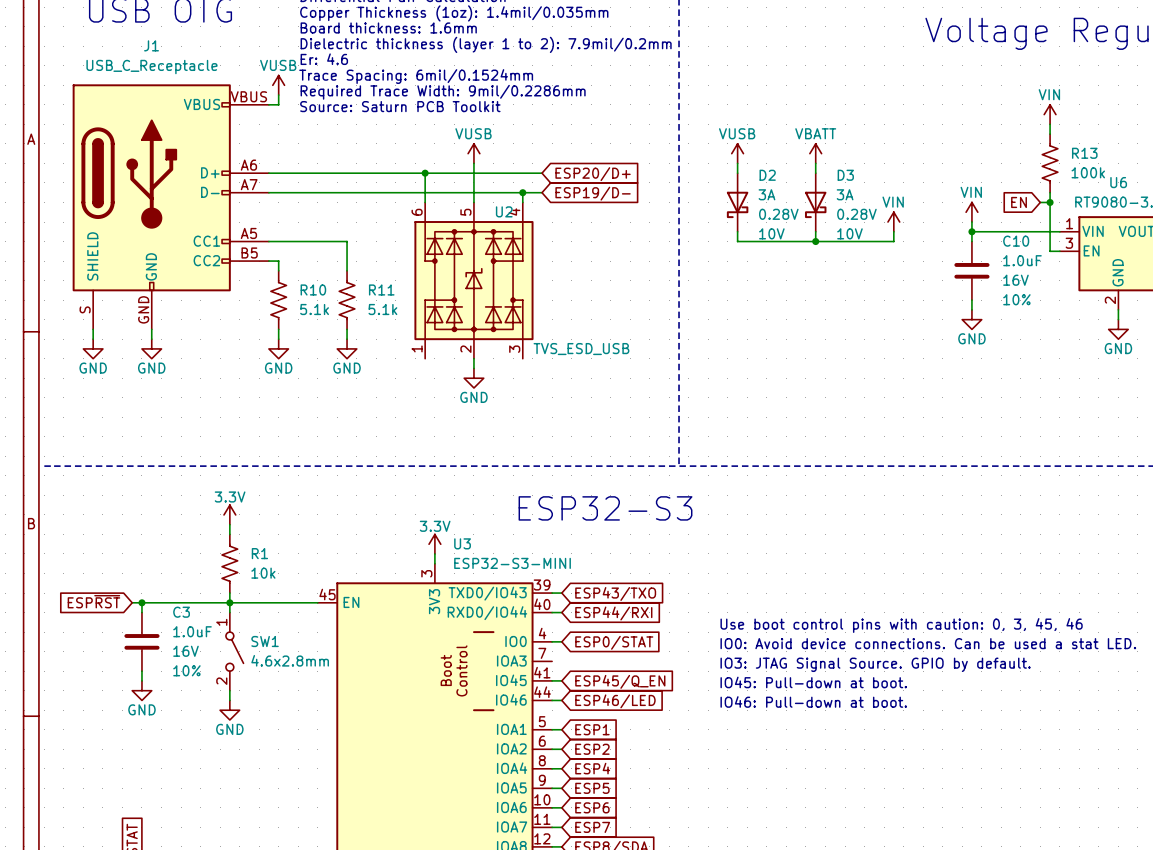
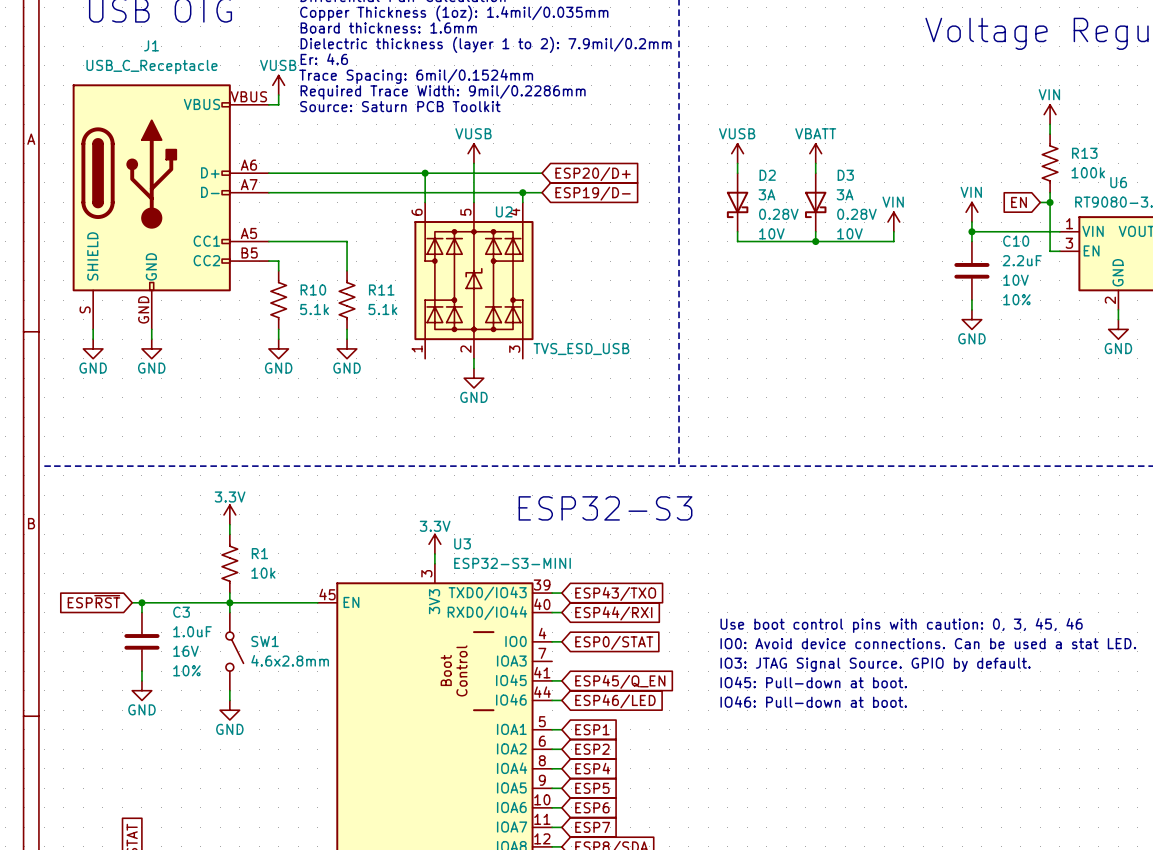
C10 value: 1.0uF (1022, 260) -> 2.2uF (1022, 260)
C10 text: 16V (1015, 280) -> 10V (1015, 280)
SW1 pin number: 1 (221, 622) -> none
SW1 pin number: 2 (221, 681) -> none

